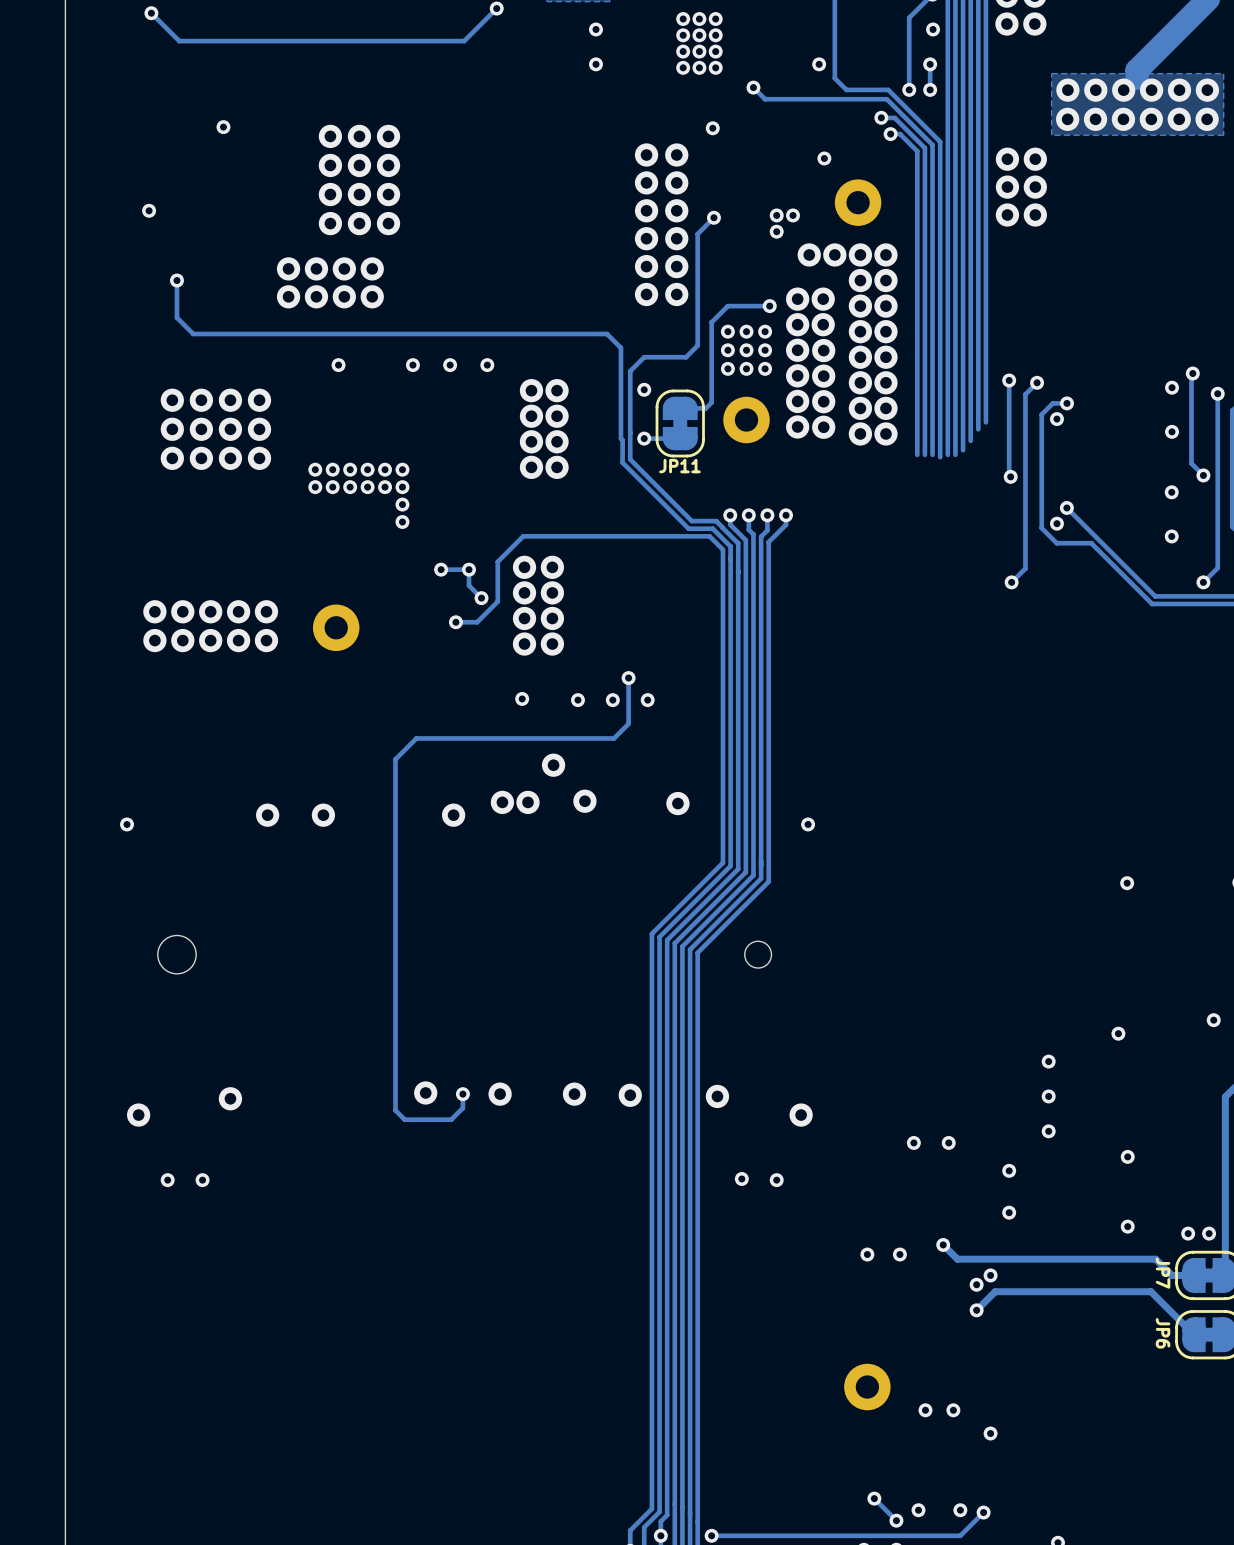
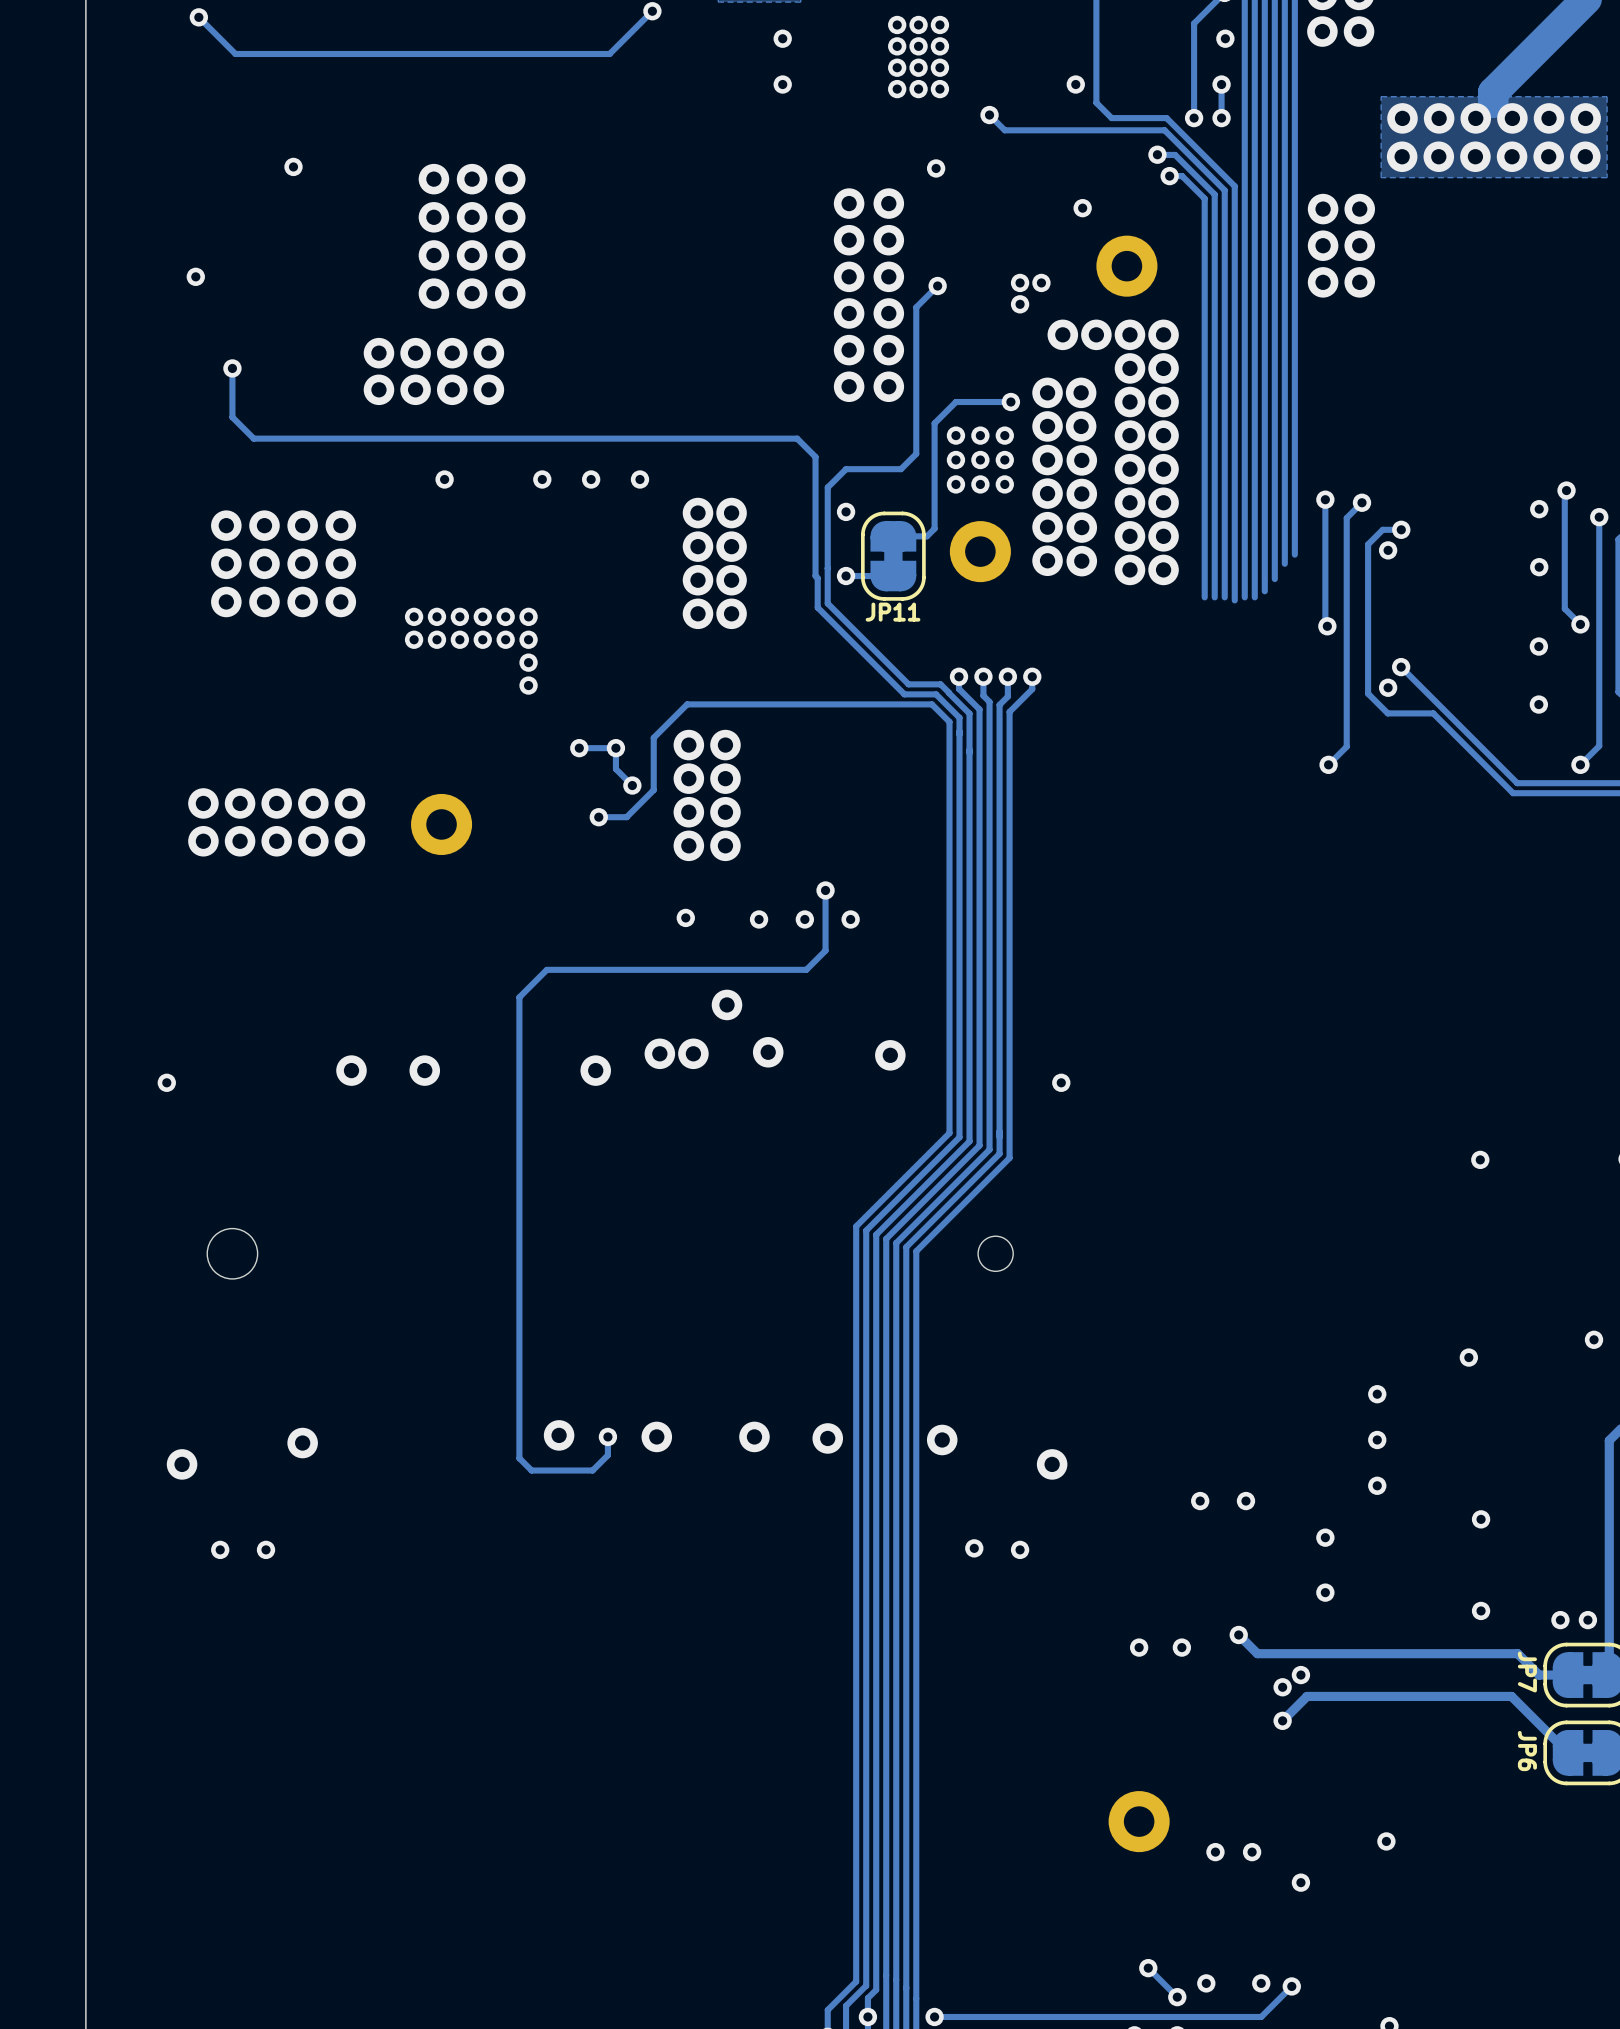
via: none -> (1386, 1841)

